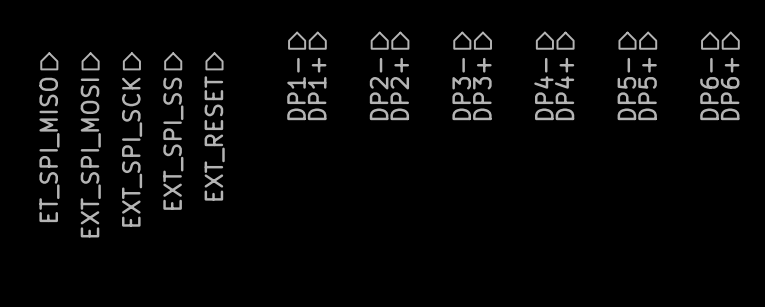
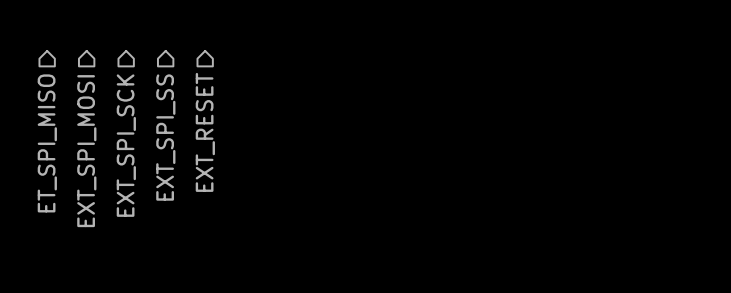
hierarchical label: DP1- (296, 89) -> none
hierarchical label: DP1+ (317, 89) -> none
hierarchical label: DP2- (379, 89) -> none
hierarchical label: DP2+ (399, 89) -> none
hierarchical label: DP3- (461, 89) -> none
hierarchical label: DP3+ (482, 89) -> none
hierarchical label: DP4- (543, 89) -> none
hierarchical label: DP4+ (564, 89) -> none
hierarchical label: DP5- (626, 89) -> none
hierarchical label: DP5+ (647, 89) -> none
hierarchical label: DP6- (709, 89) -> none
hierarchical label: DP6+ (730, 89) -> none

